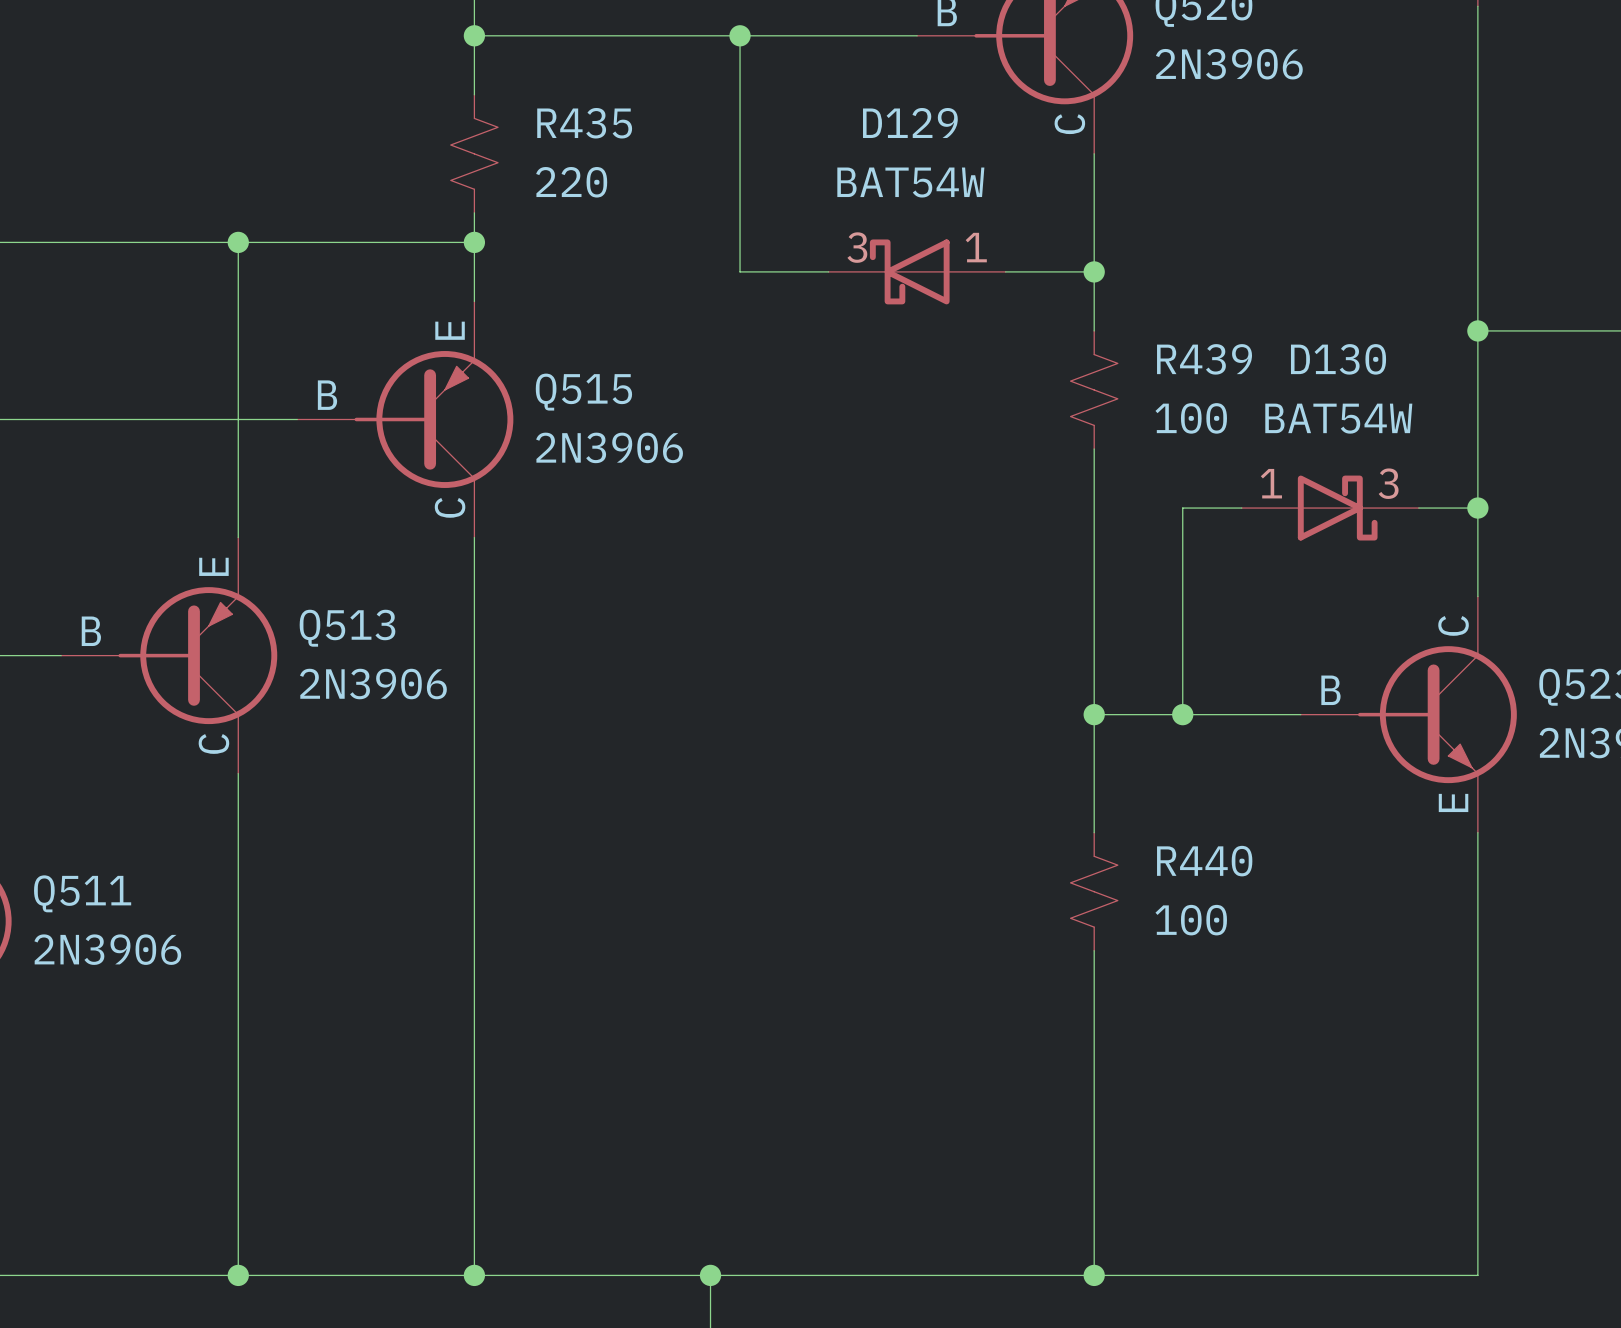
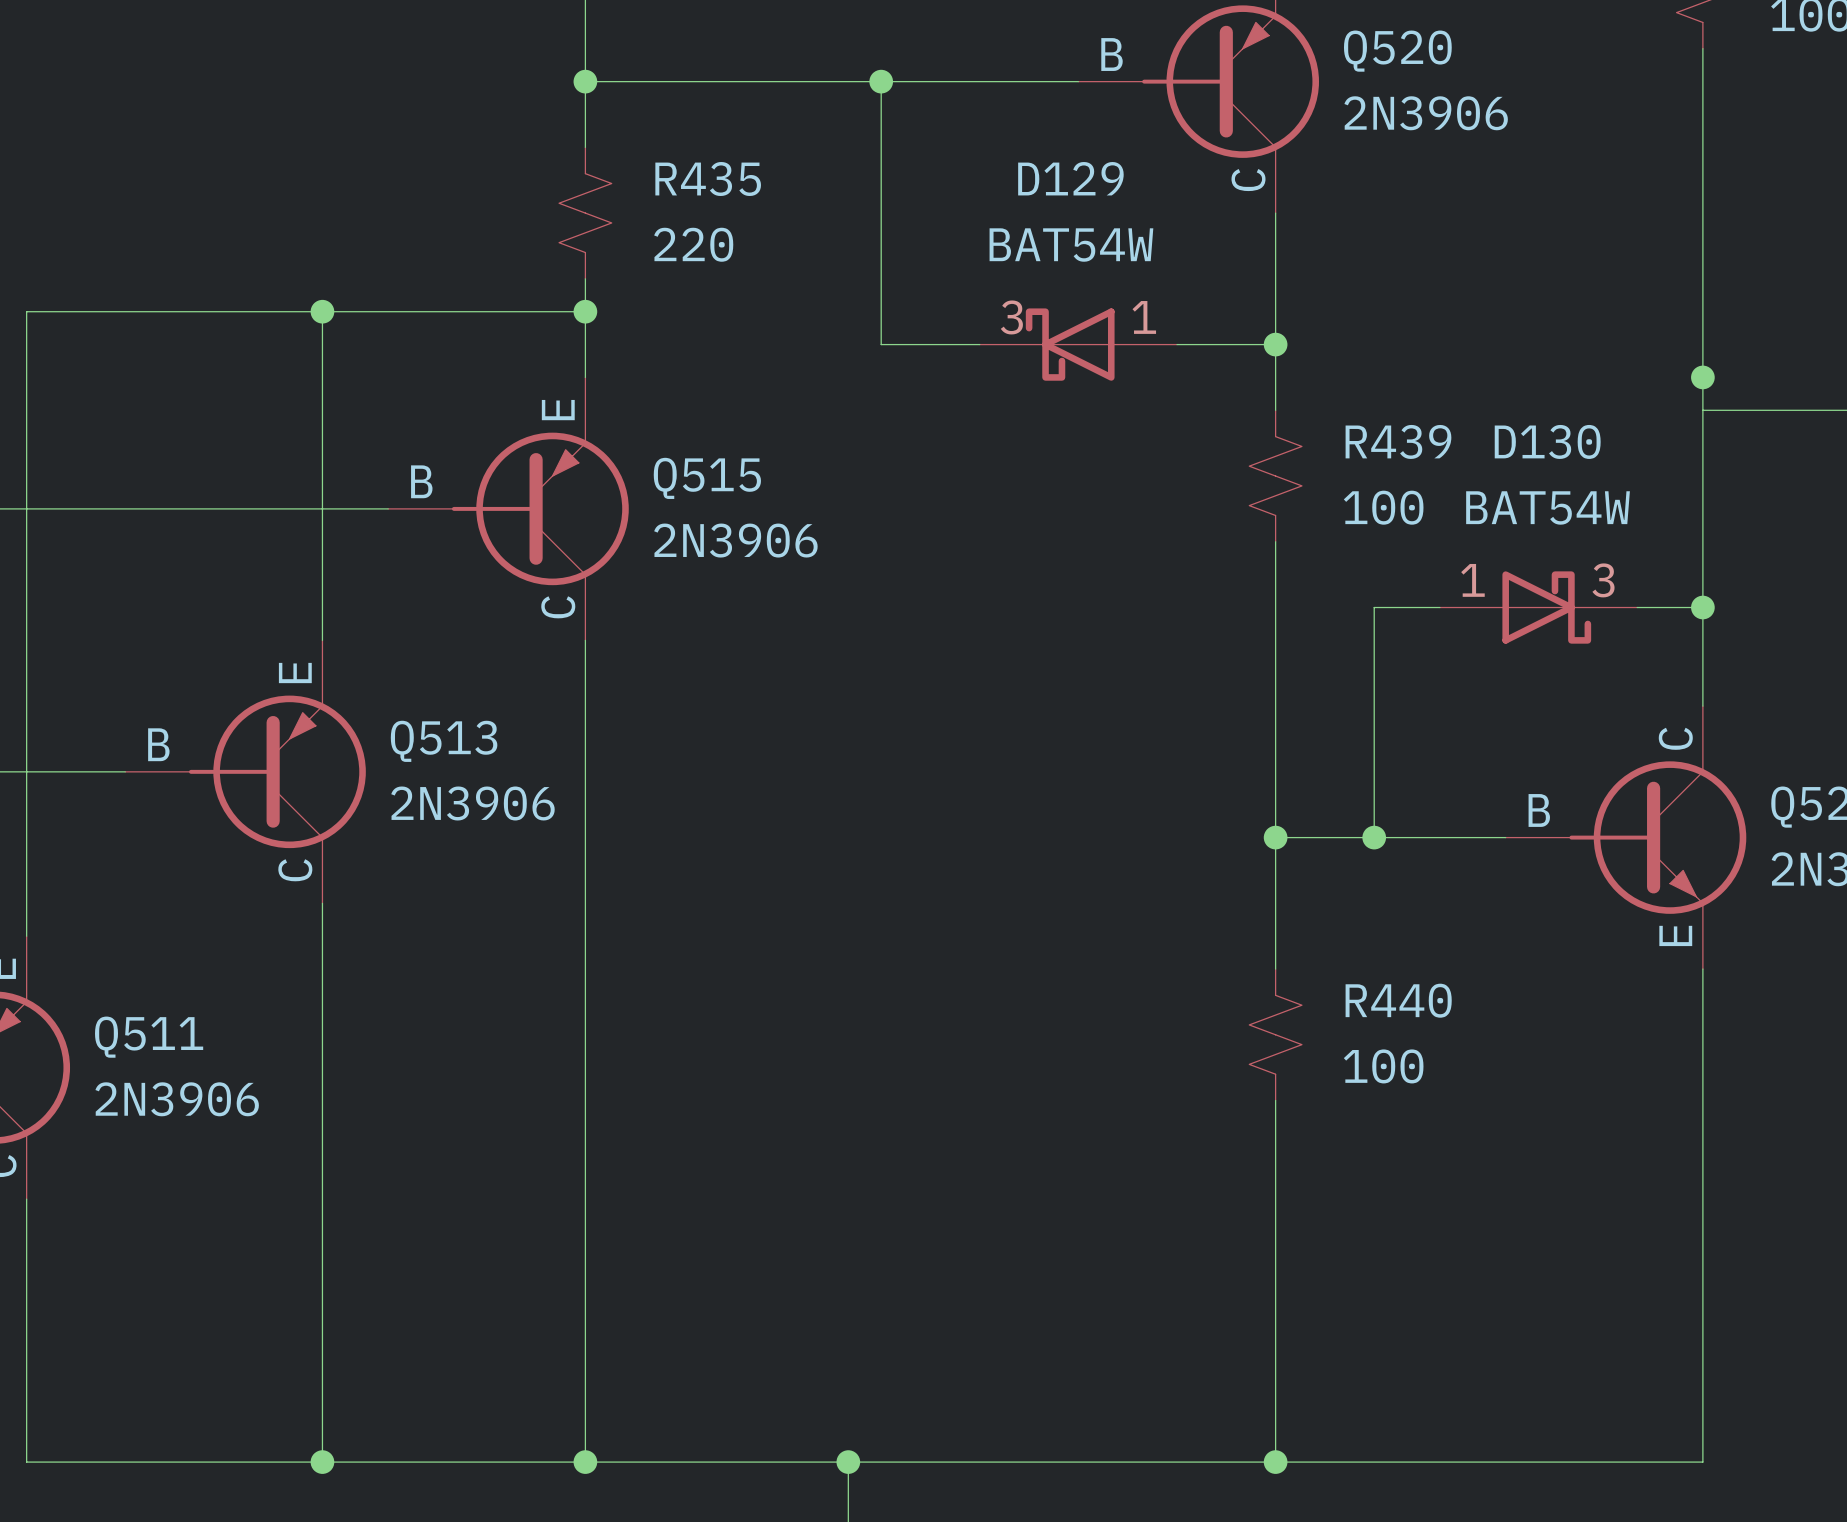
junction position: (1477, 330) -> (1702, 377)

